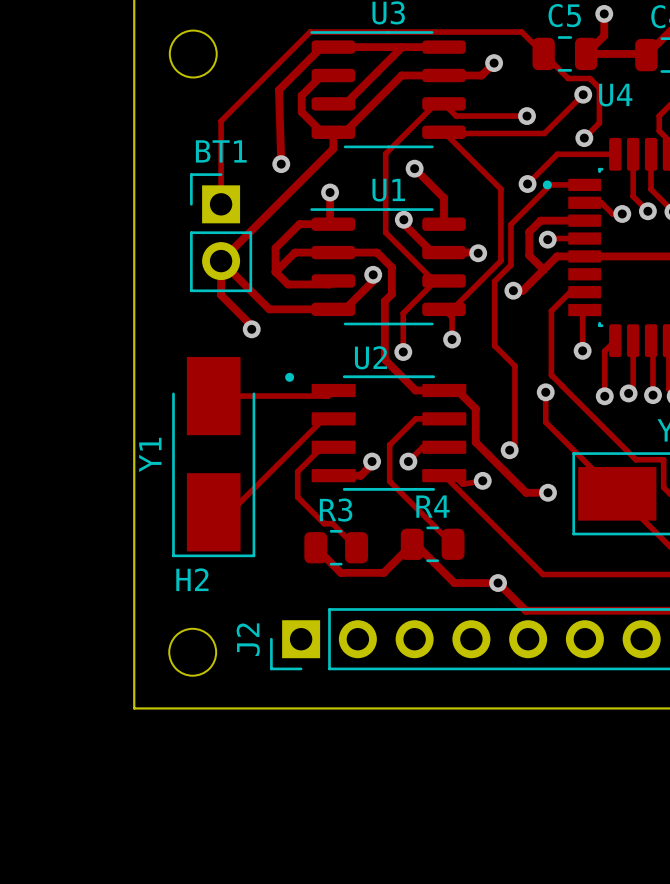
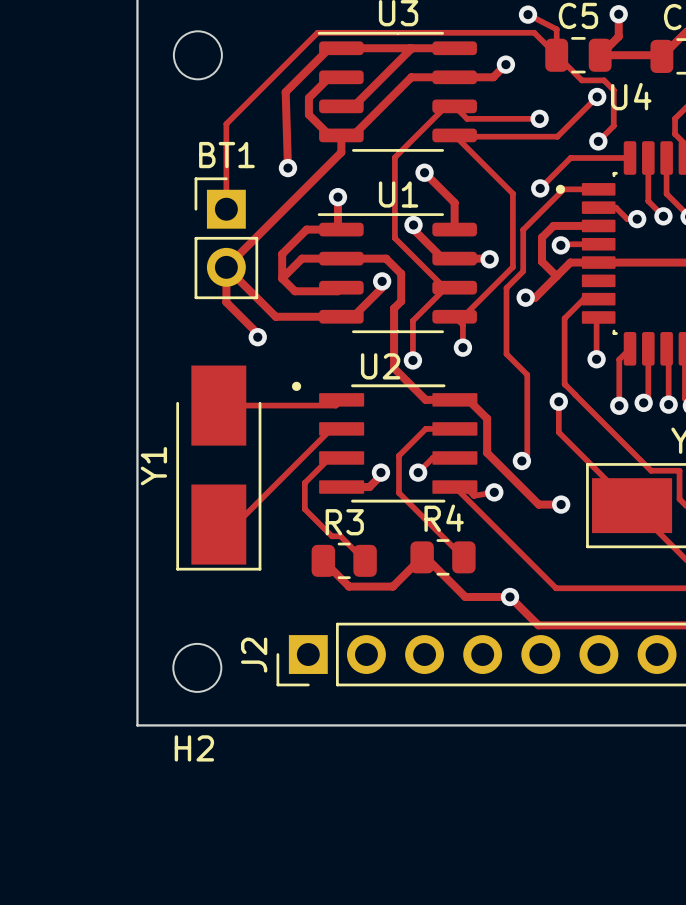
track: none -> (528, 14) (556, 29) (556, 55)
via: none -> (528, 14)
H2 name position: H2 (192, 579) -> H2 (194, 748)

